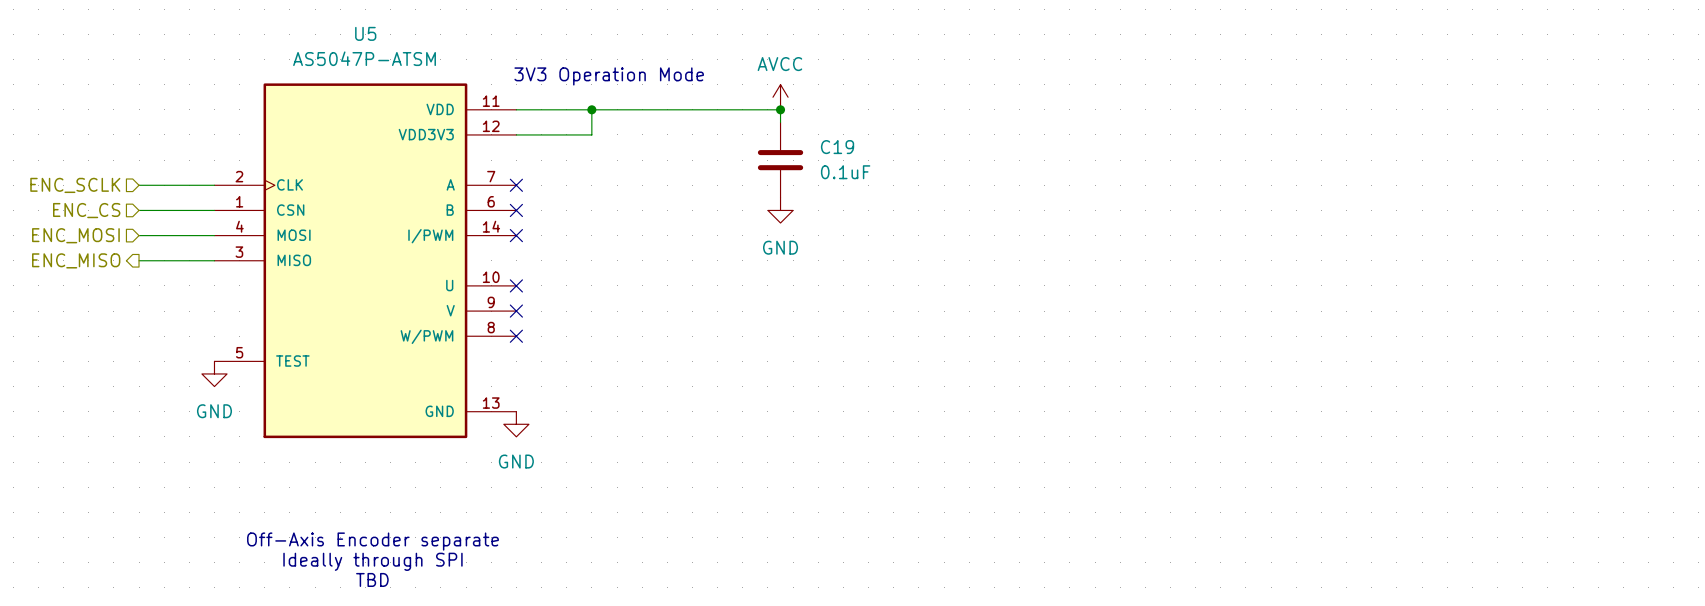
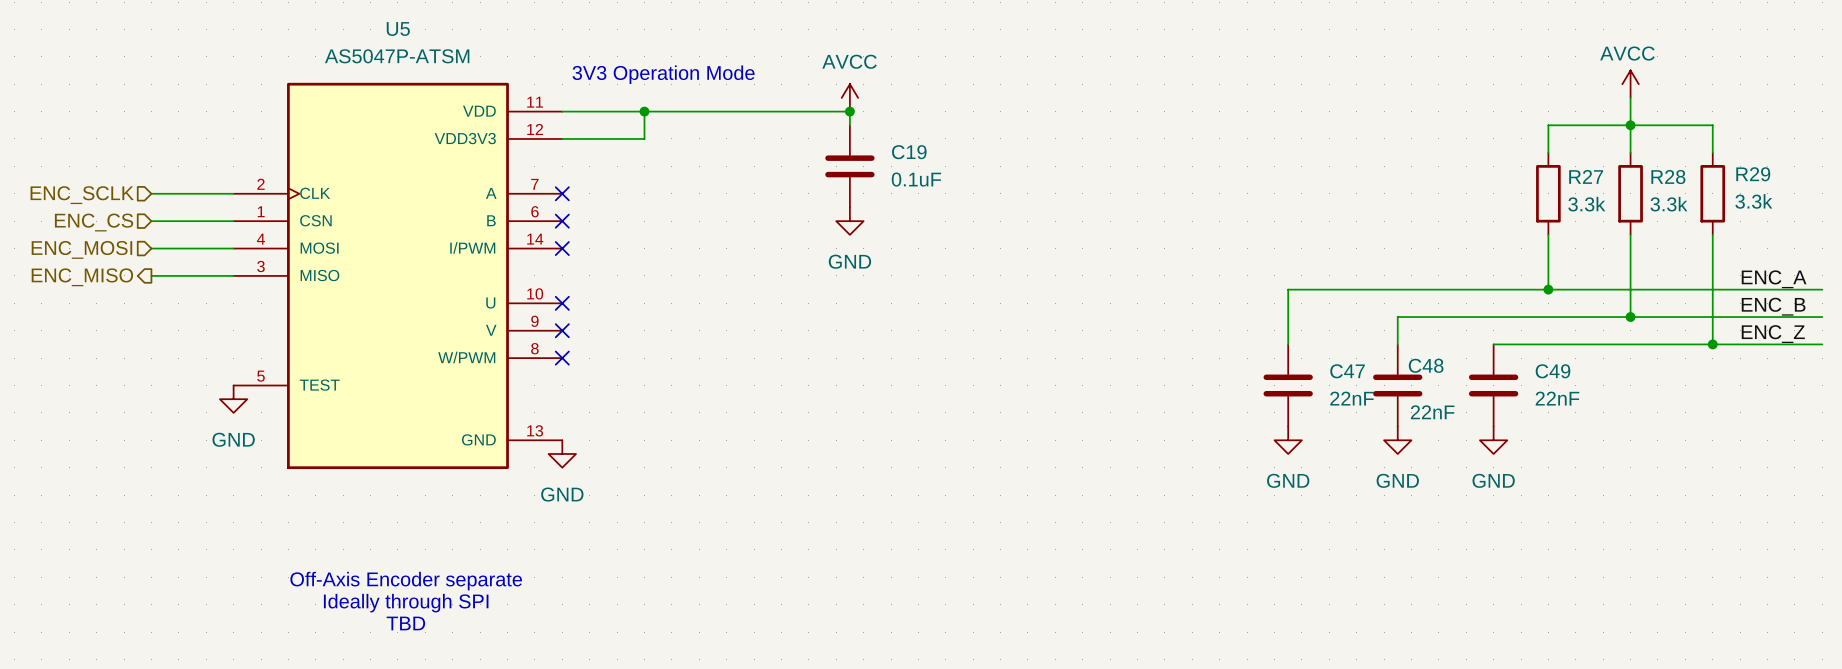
power symbol: none -> AVCC (1630, 84)
wire: none -> (1630, 97) (1630, 152)
junction: none -> (1630, 125)
wire: none -> (1548, 152) (1548, 125) (1712, 125) (1712, 152)
R27: none -> 3.3k (1548, 193)
R28: none -> 3.3k (1630, 193)
R29: none -> 3.3k (1712, 193)
wire: none -> (1548, 234) (1548, 289)
wire: none -> (1630, 234) (1630, 317)
wire: none -> (1712, 234) (1712, 344)
label: none -> ENC_A (1774, 279)
junction: none -> (1548, 289)
wire: none -> (1822, 289) (1288, 289) (1288, 344)
label: none -> ENC_B (1773, 306)
junction: none -> (1630, 317)
wire: none -> (1822, 317) (1397, 317) (1397, 344)
label: none -> ENC_Z (1773, 334)
wire: none -> (1493, 344) (1822, 344)
junction: none -> (1712, 344)
C47: none -> 22nF (1288, 385)
C48: none -> 22nF (1397, 385)
C49: none -> 22nF (1493, 385)
power symbol: none -> GND (1288, 440)
power symbol: none -> GND (1397, 440)
power symbol: none -> GND (1493, 440)

